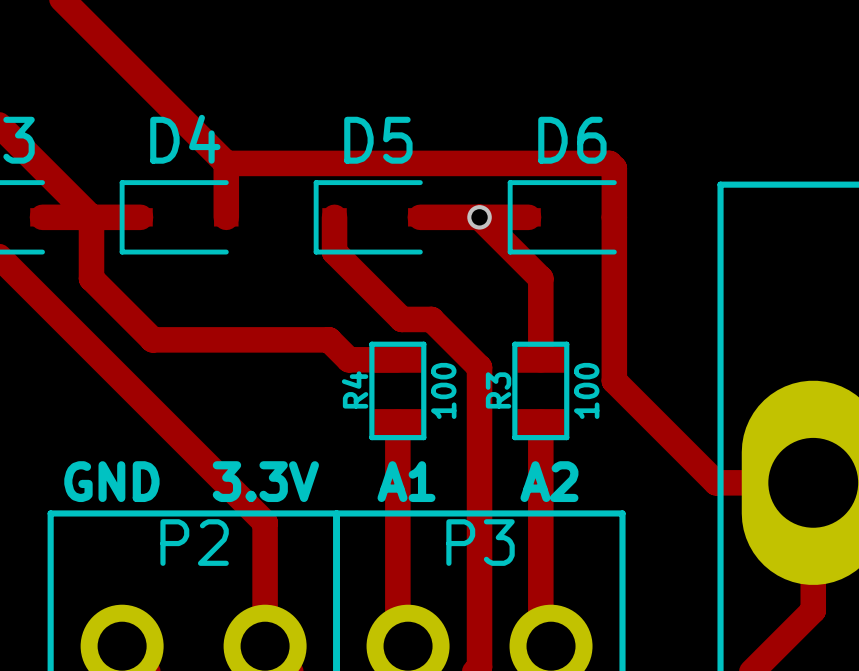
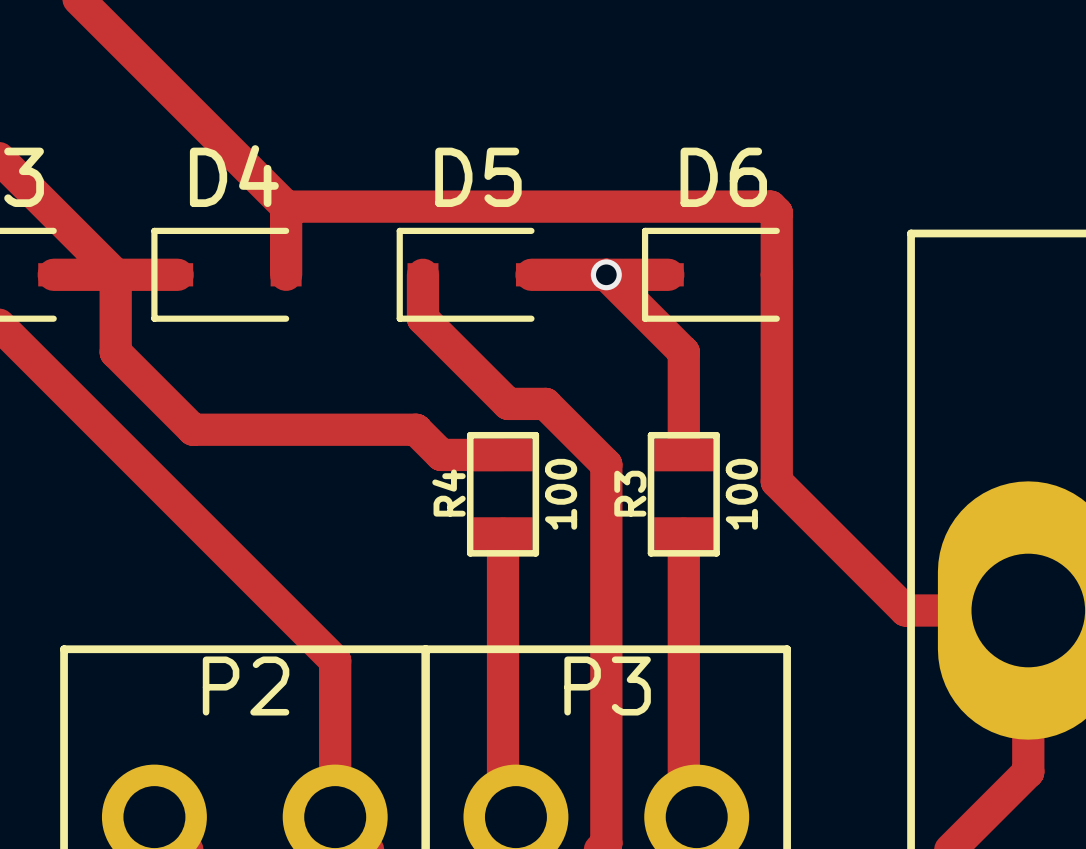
text: GND (111, 481) -> none
text: 3.3V (265, 481) -> none
text: A1 (406, 481) -> none
text: A2 (549, 481) -> none

